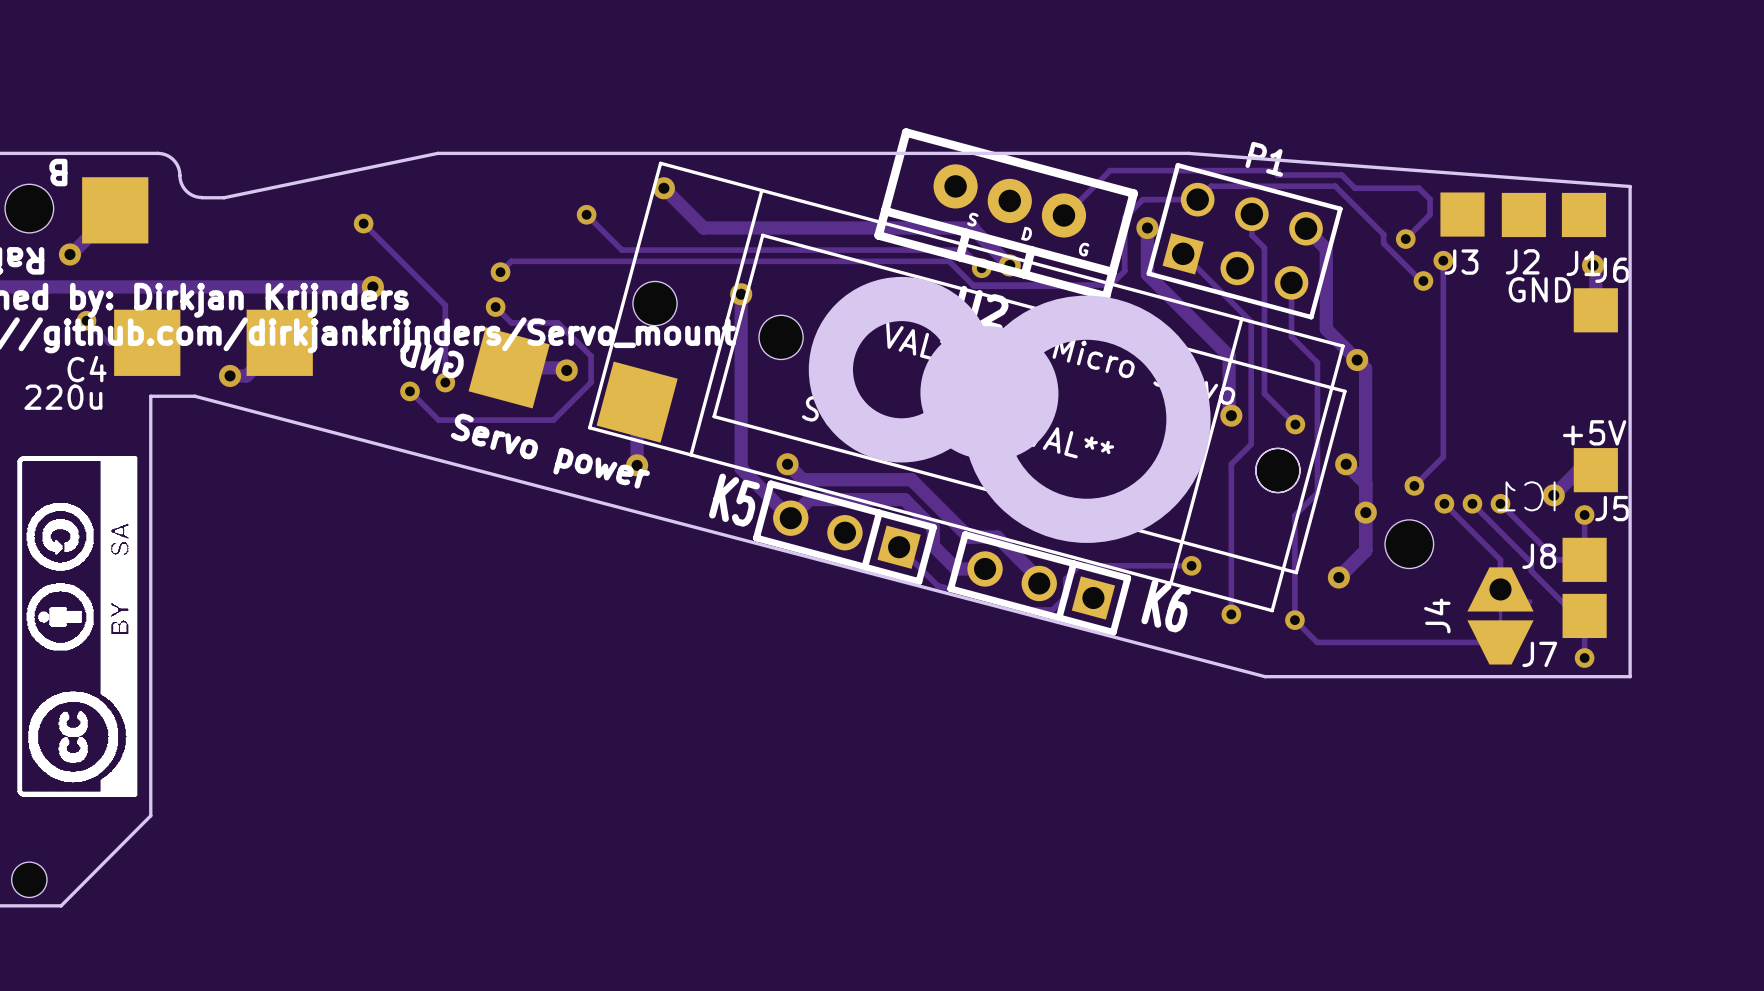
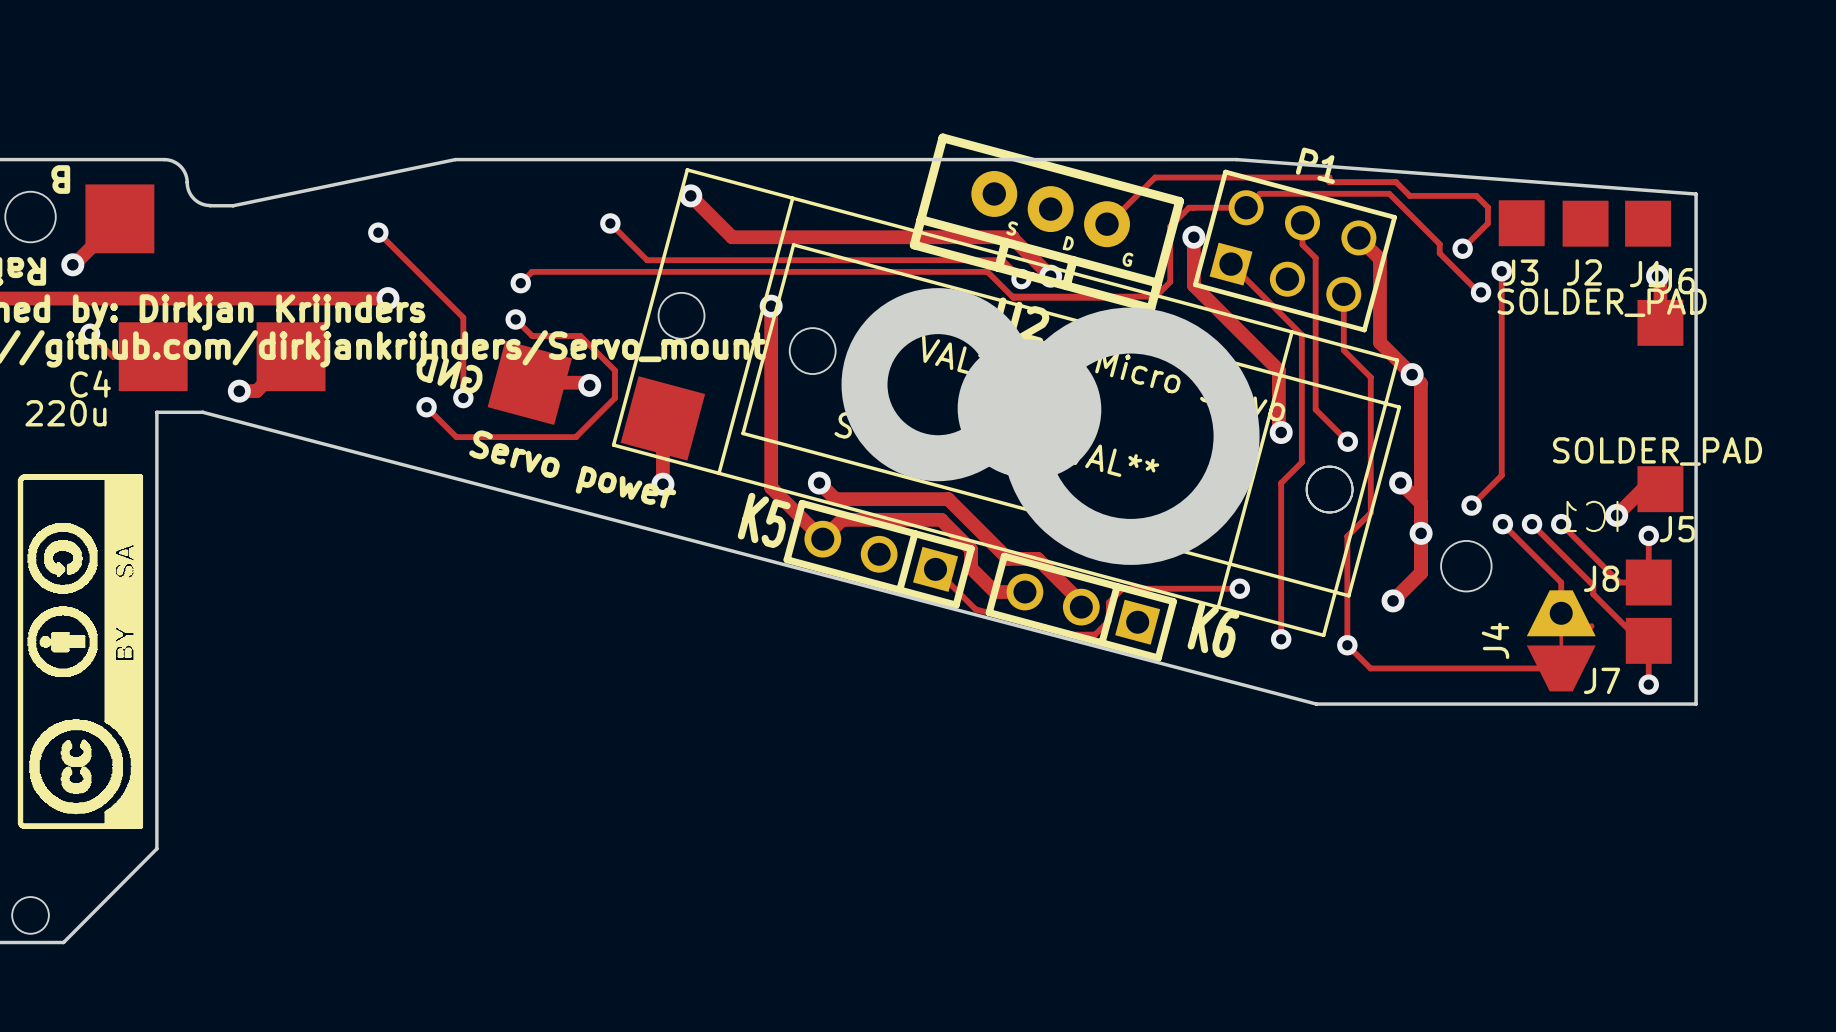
J6 value: GND (1539, 289) -> SOLDER_PAD (1602, 302)
J5 value: +5V (1594, 432) -> SOLDER_PAD (1657, 451)

